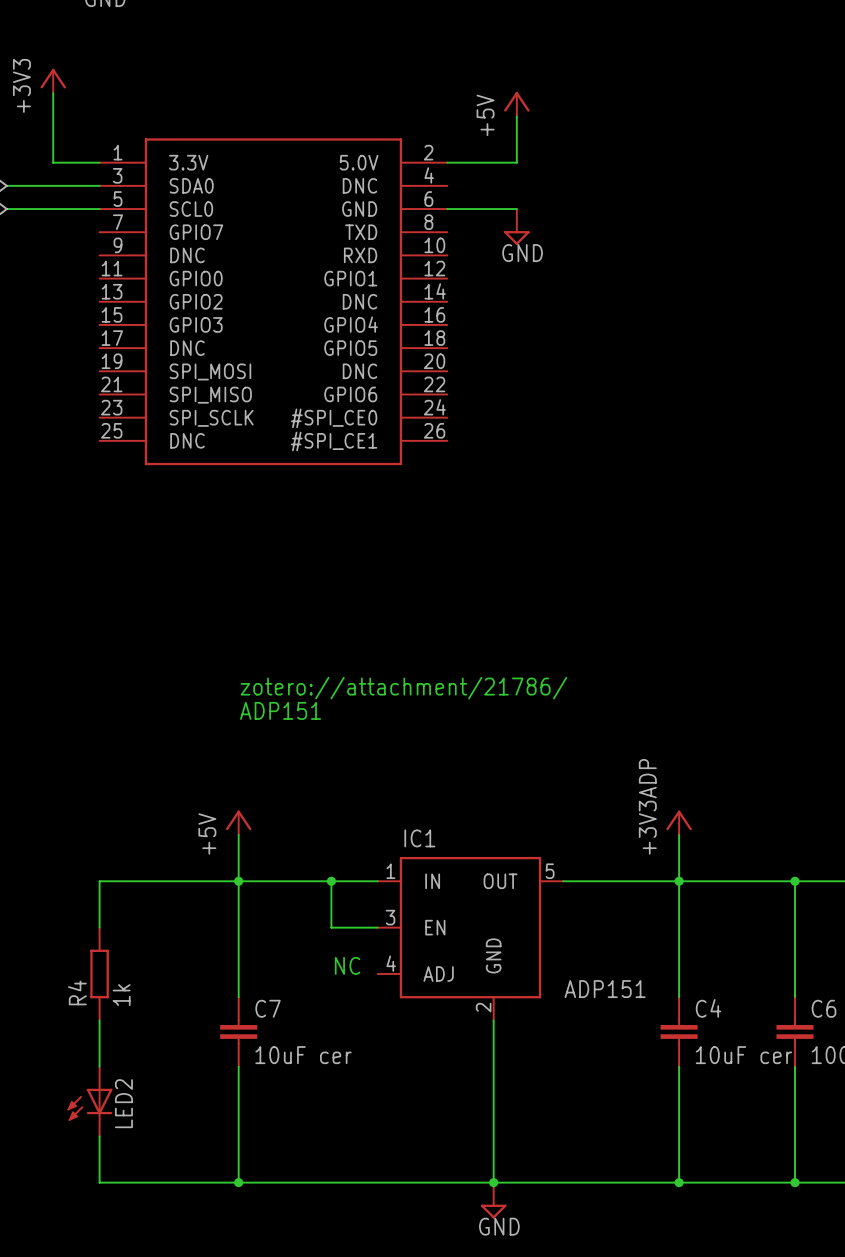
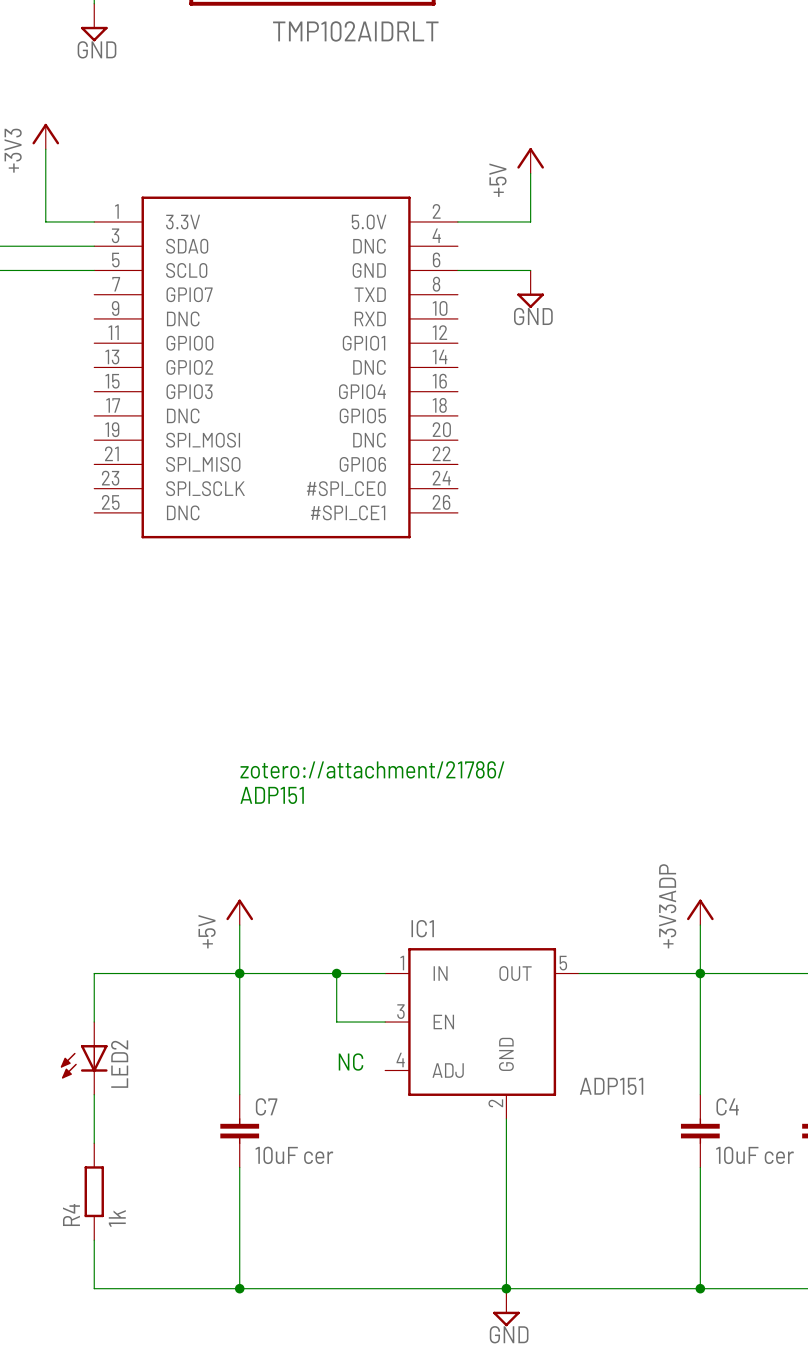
R4 position: (99, 974) -> (94, 1191)
LED2 position: (89, 1101) -> (84, 1058)

